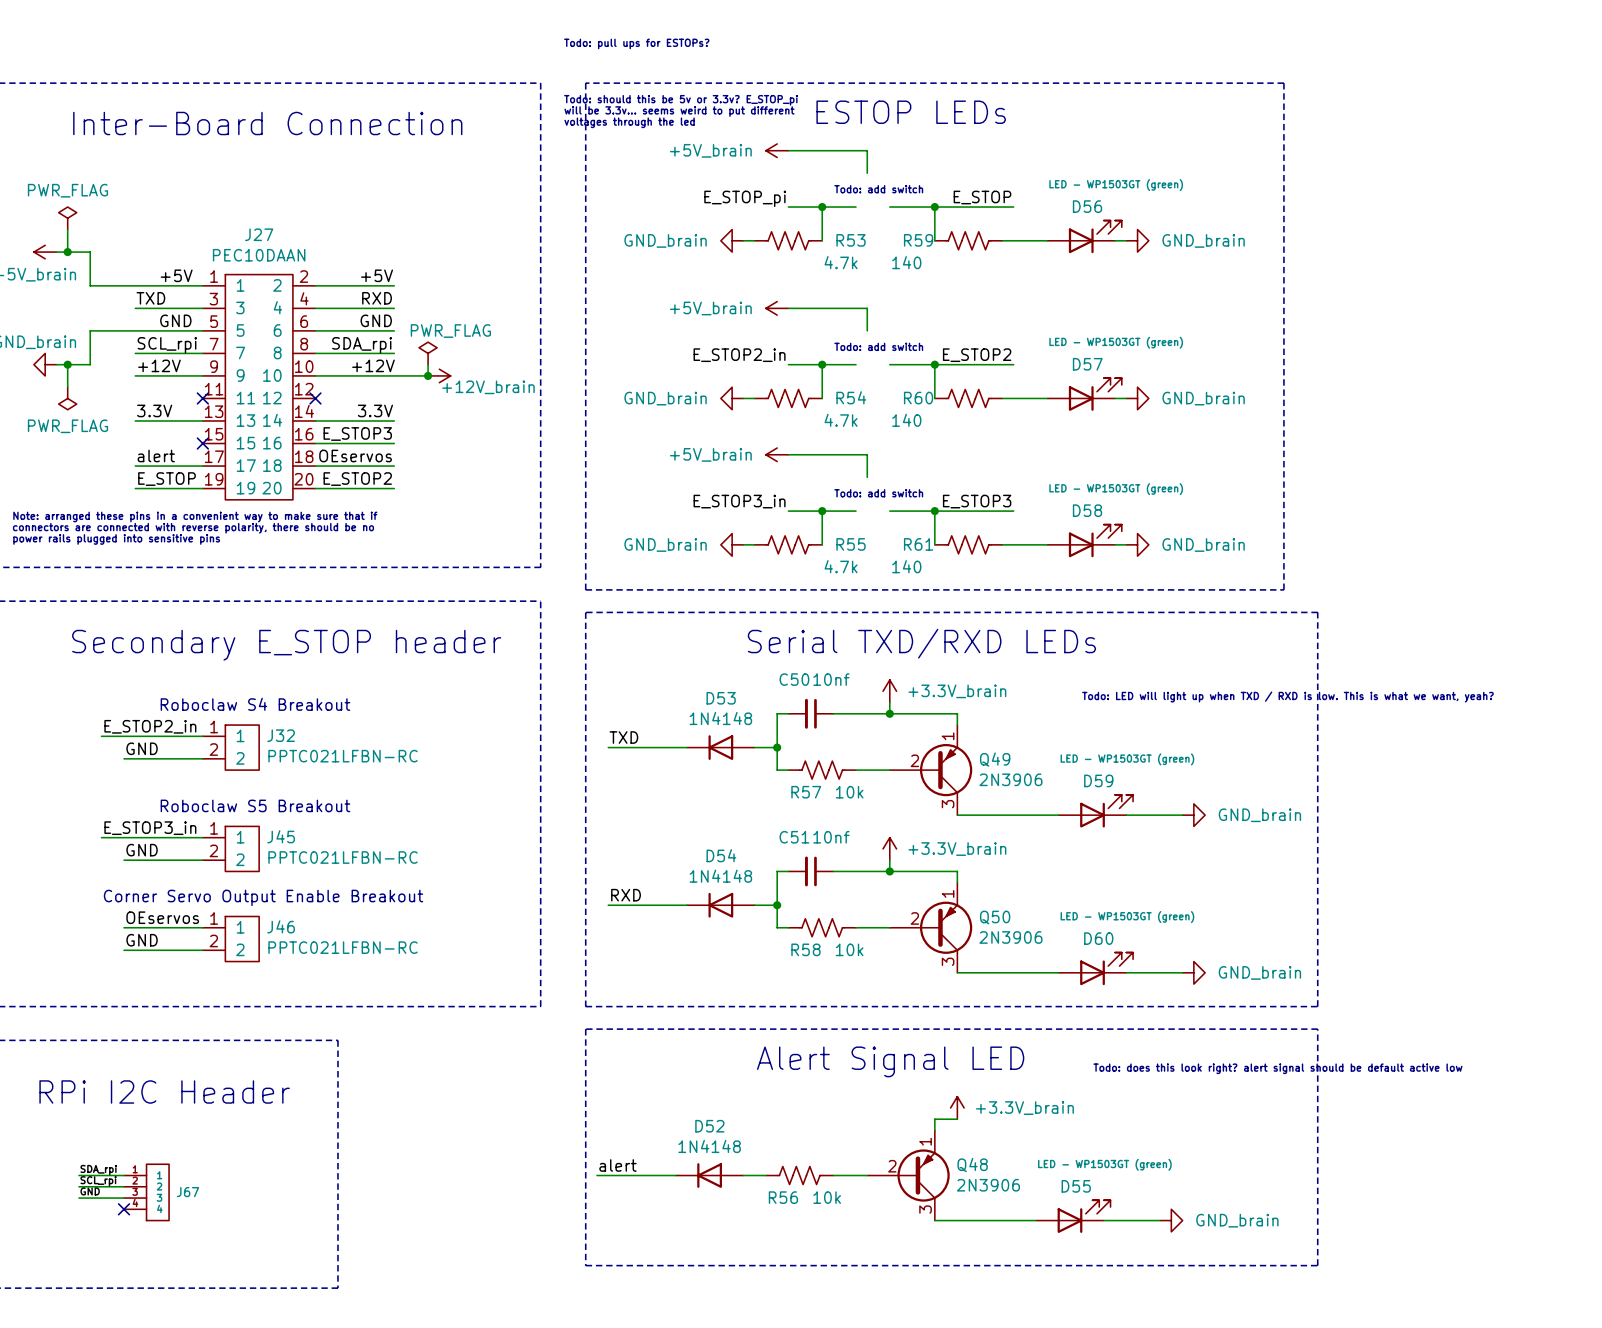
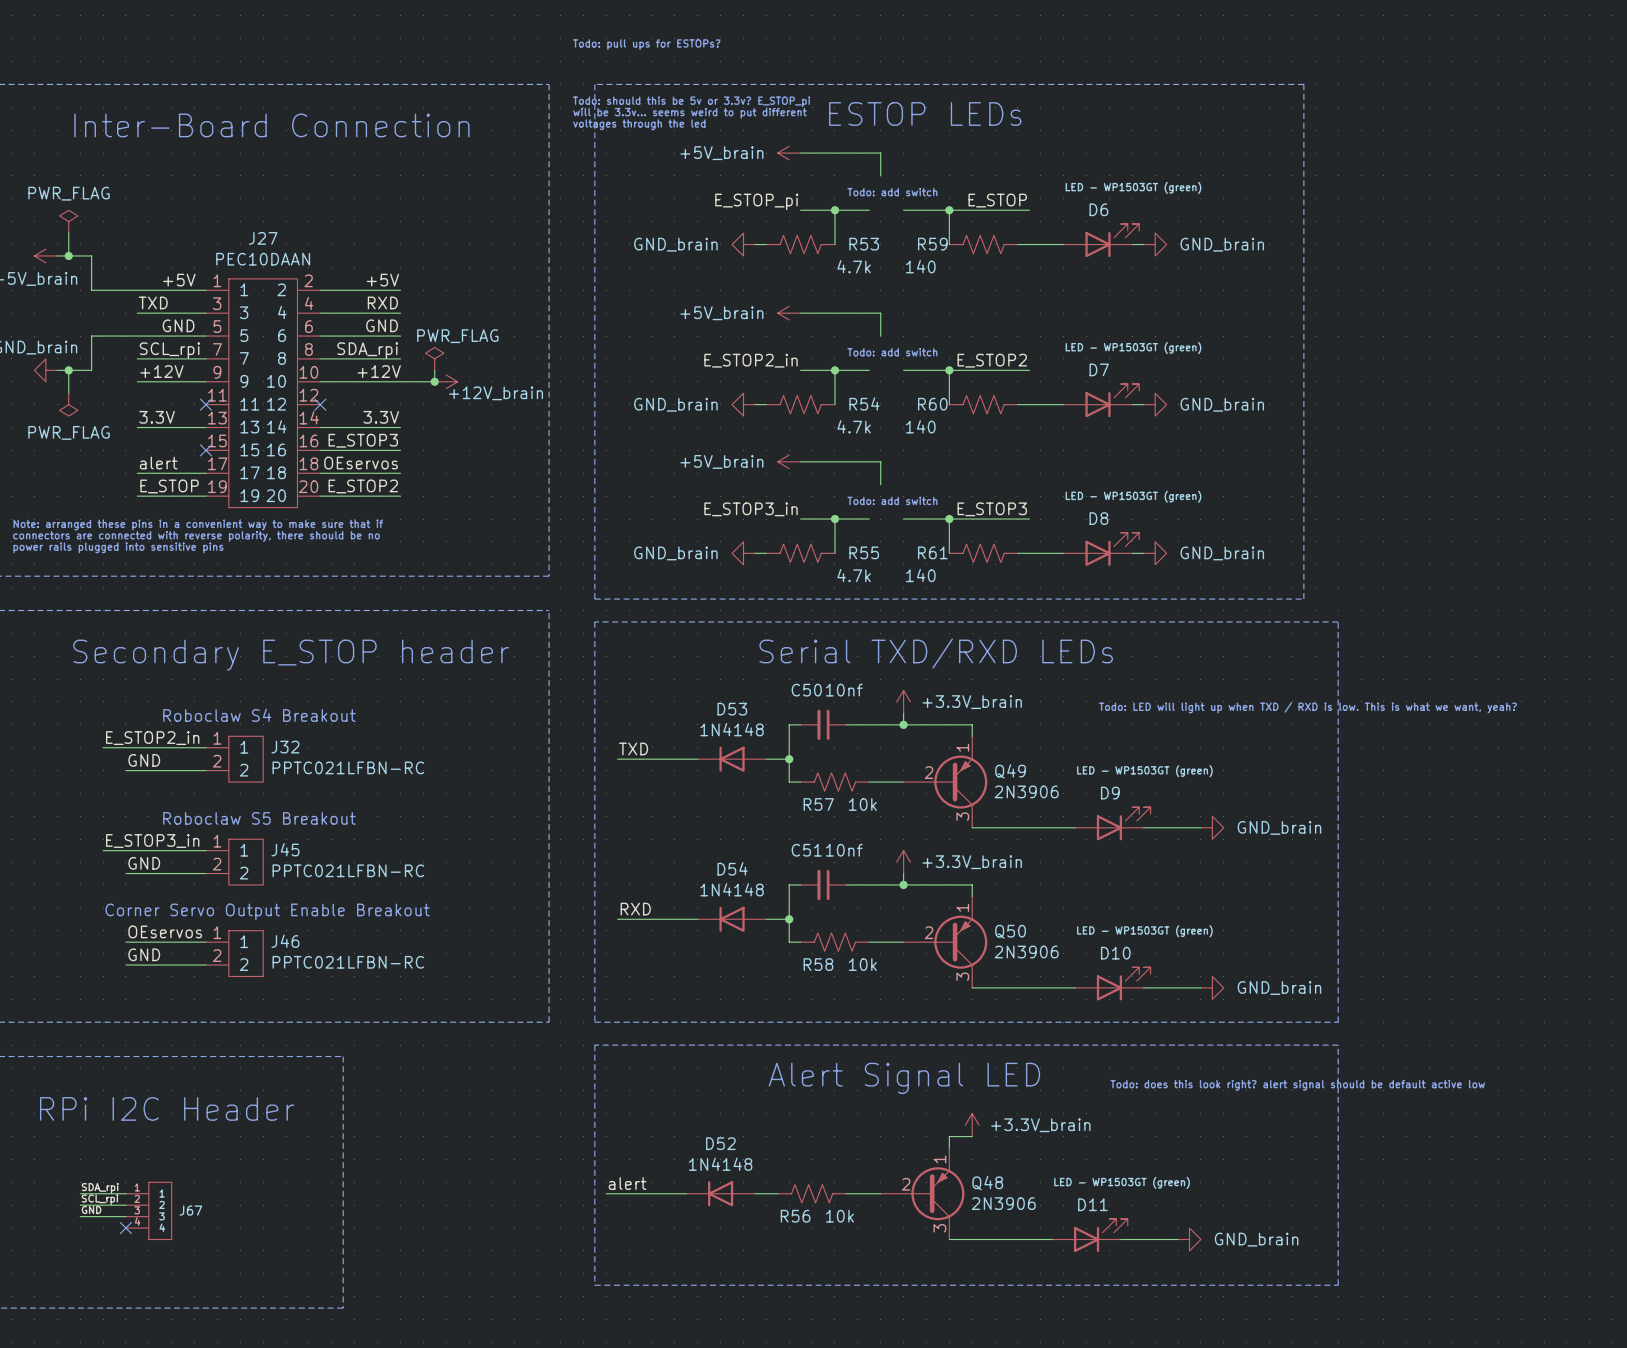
D56 name: D56 (1087, 206) -> D6 (1098, 209)
D57 name: D57 (1087, 364) -> D7 (1099, 369)
D58 name: D58 (1087, 510) -> D8 (1098, 518)
D59 name: D59 (1098, 780) -> D9 (1110, 793)
D60 name: D60 (1098, 938) -> D10 (1115, 953)
D55 name: D55 (1076, 1186) -> D11 (1092, 1204)

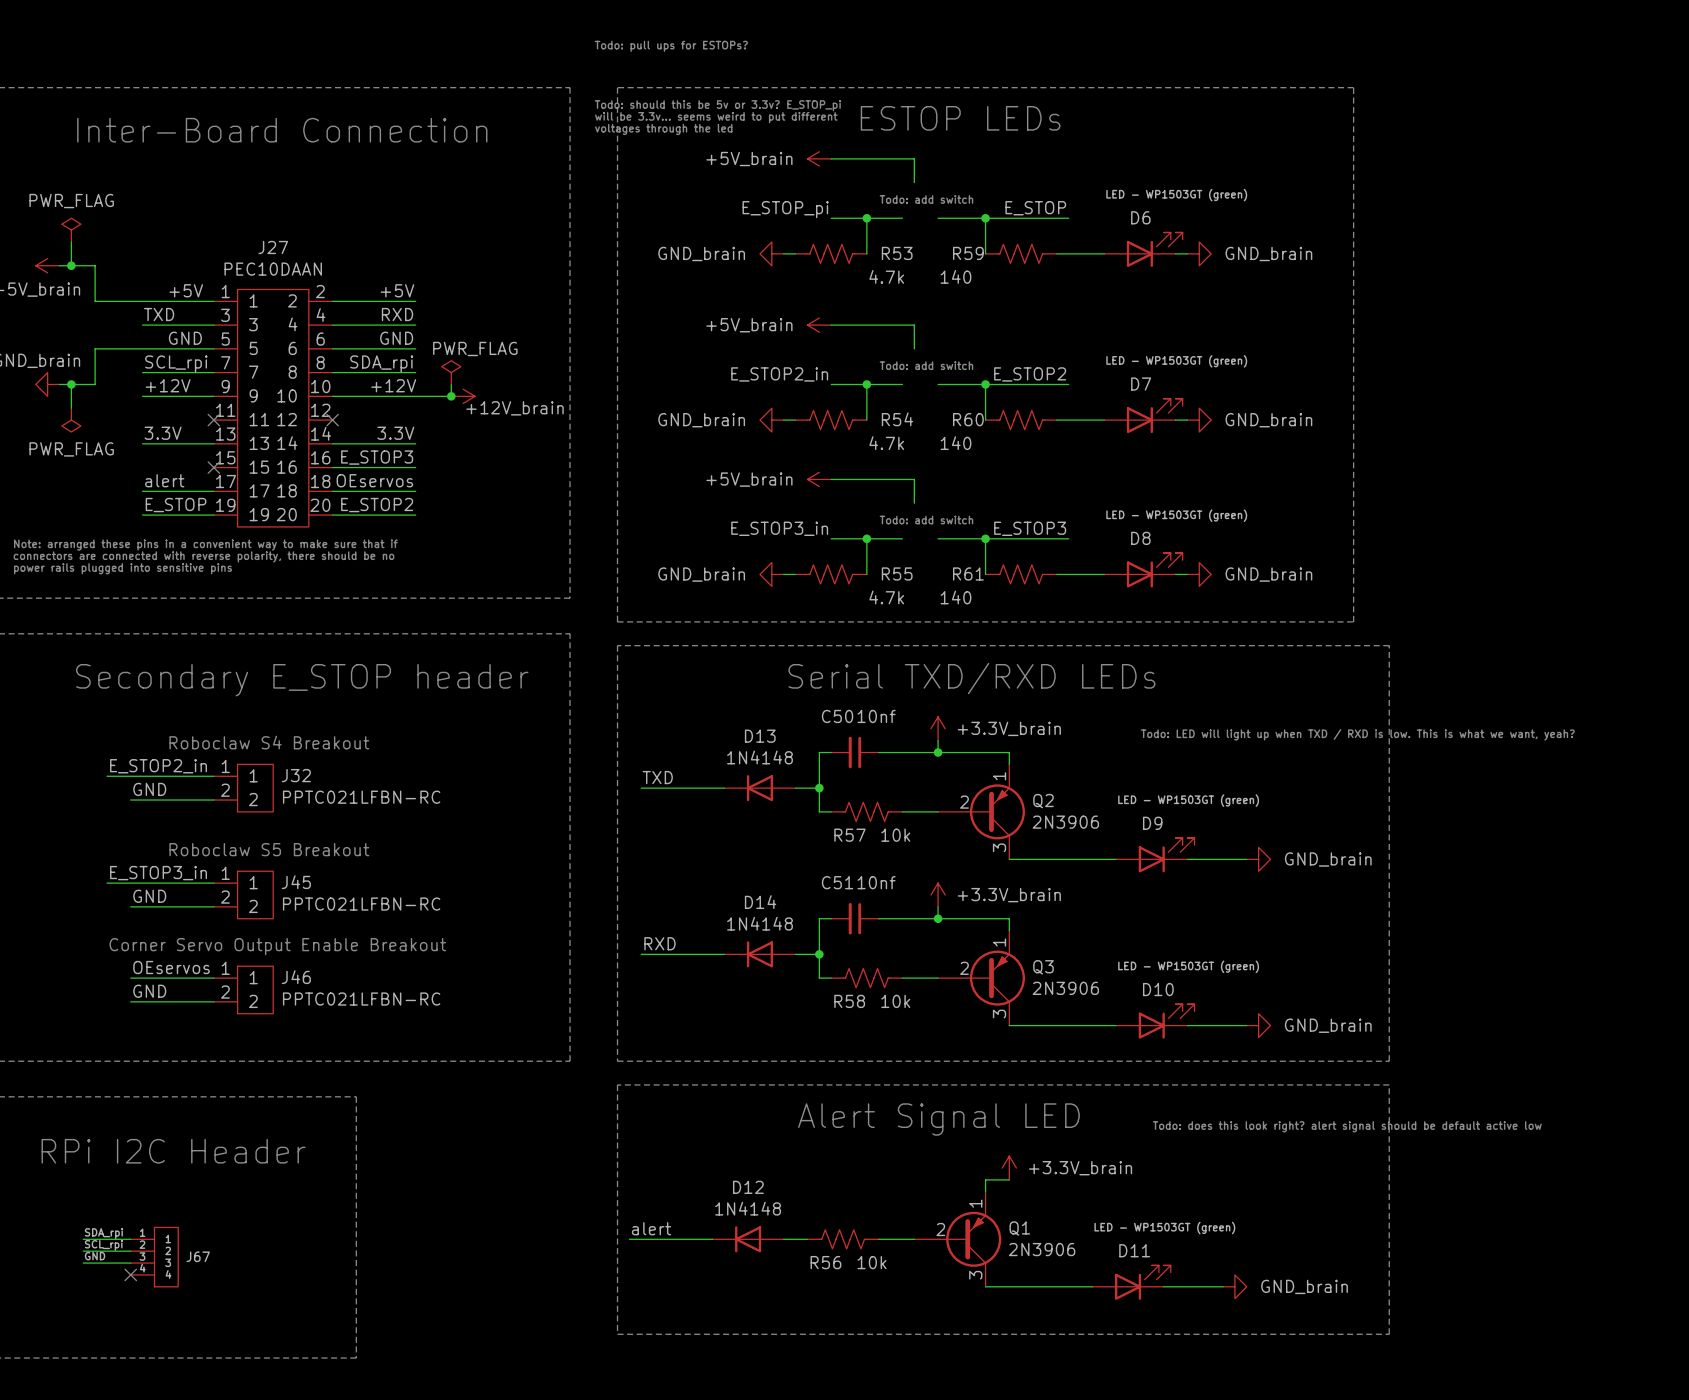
D53 name: D53 (732, 709) -> D13 (760, 736)
Q49 name: Q49 (1010, 771) -> Q2 (1043, 801)
D54 name: D54 (732, 868) -> D14 (760, 902)
Q50 name: Q50 (1010, 931) -> Q3 (1043, 967)
D52 name: D52 (720, 1143) -> D12 (748, 1187)
Q48 name: Q48 (987, 1183) -> Q1 (1019, 1228)

